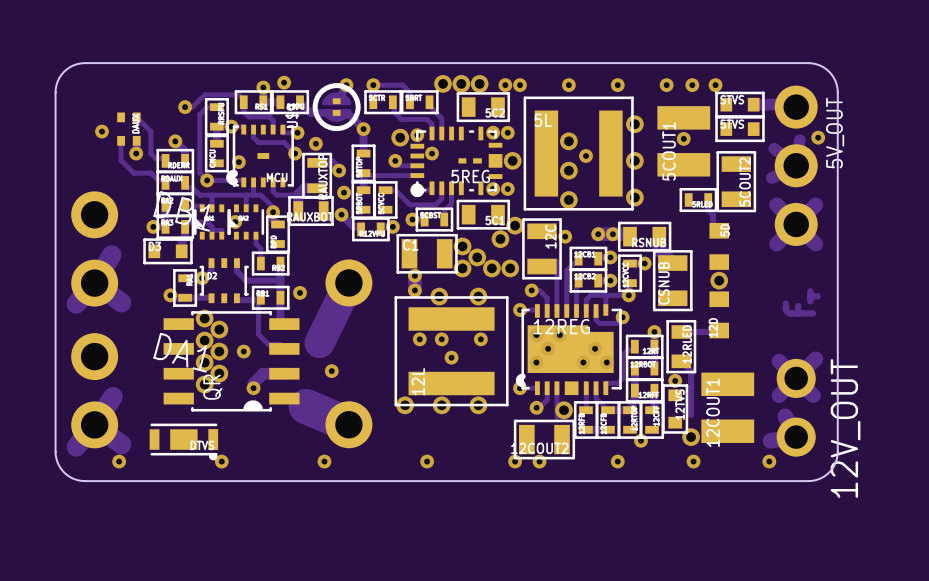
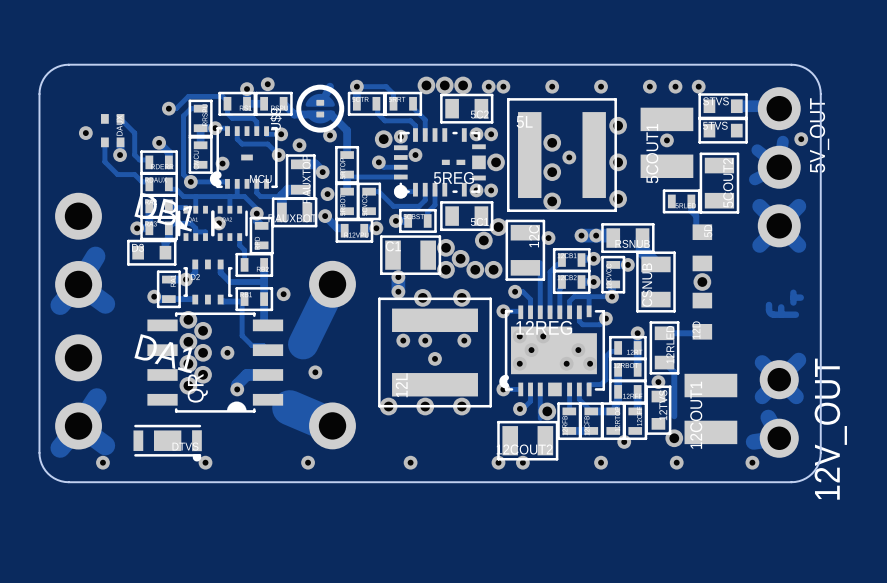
via: (346, 85) -> none
via position: (363, 129) -> (330, 135)

